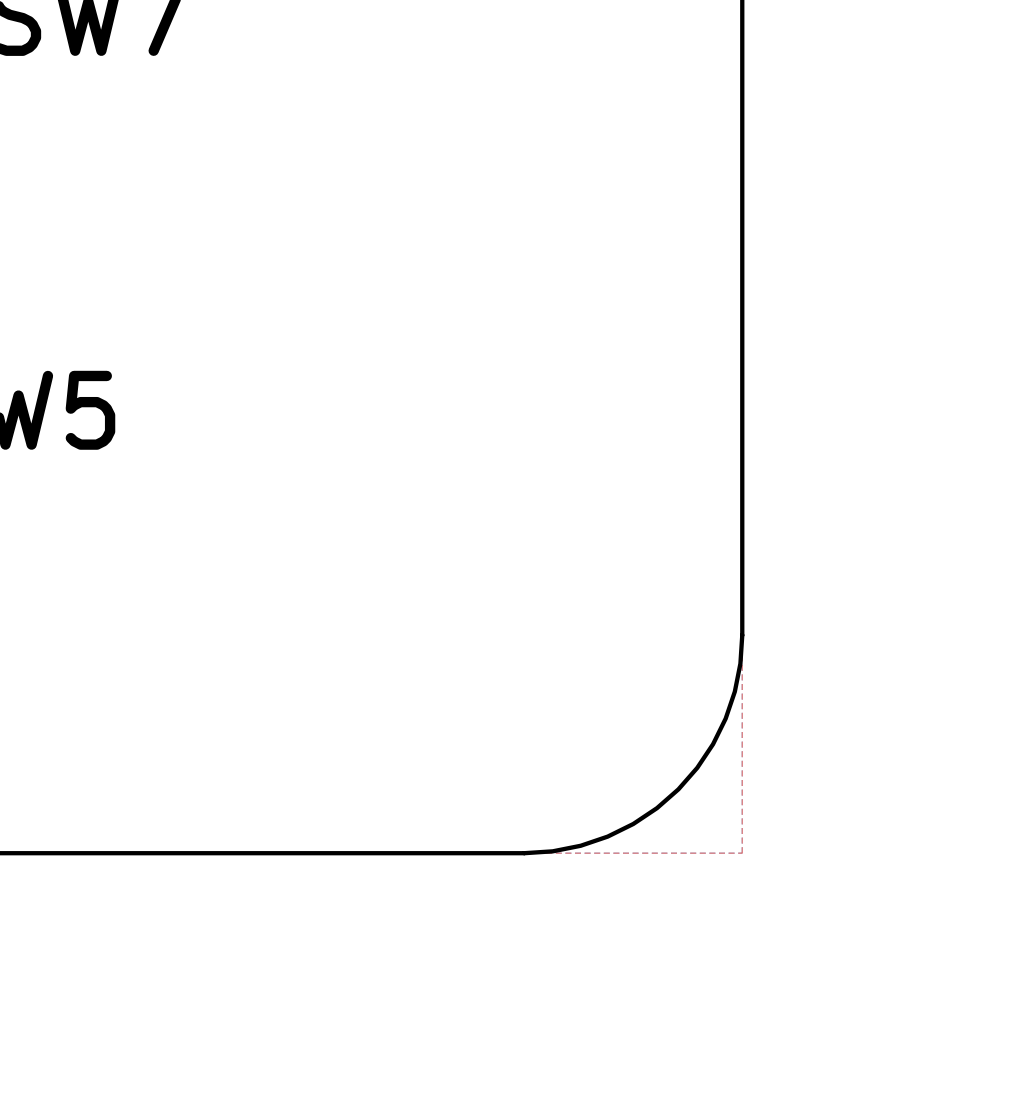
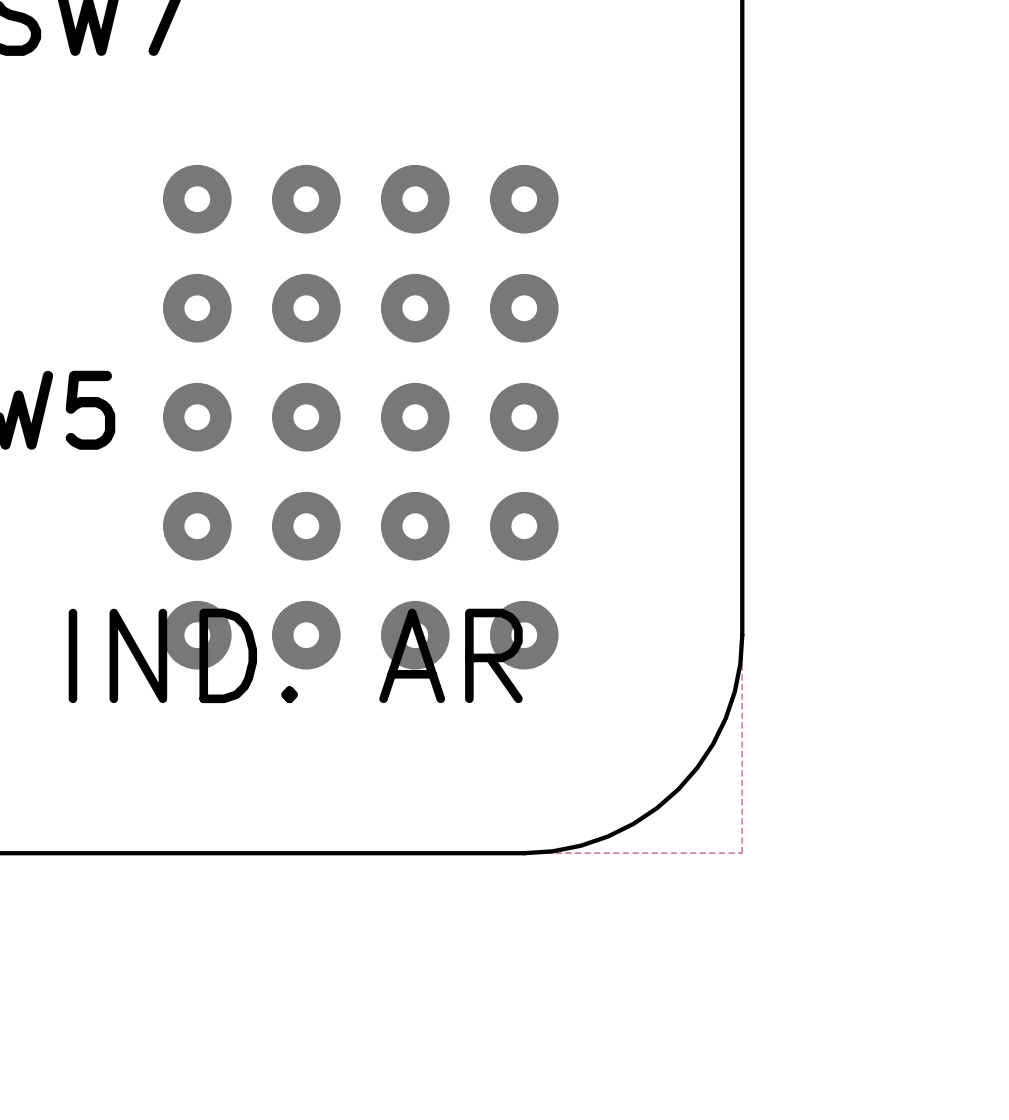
via: none -> (197, 199)
via: none -> (306, 199)
via: none -> (415, 199)
via: none -> (524, 199)
via: none -> (197, 308)
via: none -> (306, 308)
via: none -> (415, 308)
via: none -> (524, 308)
via: none -> (197, 417)
via: none -> (306, 417)
via: none -> (415, 417)
via: none -> (524, 417)
via: none -> (197, 526)
via: none -> (306, 526)
via: none -> (415, 526)
via: none -> (524, 526)
via: none -> (197, 635)
via: none -> (306, 635)
via: none -> (415, 635)
via: none -> (524, 635)
text: none -> IND. AR (295, 655)

